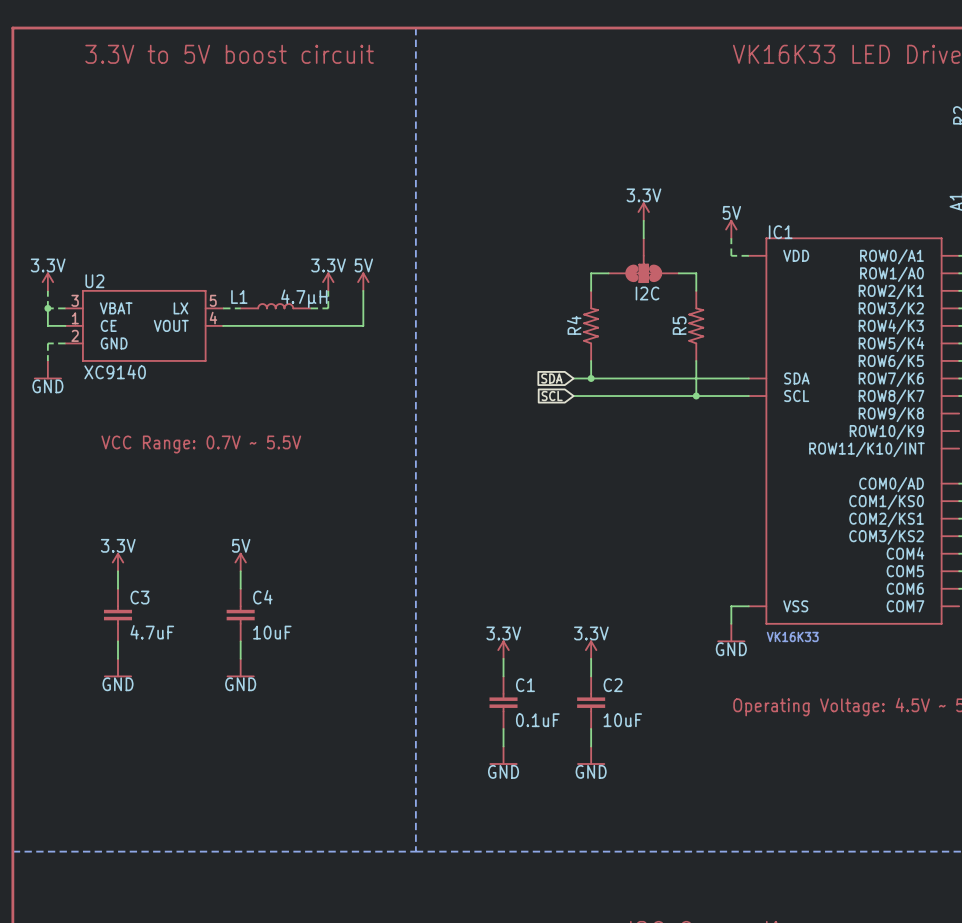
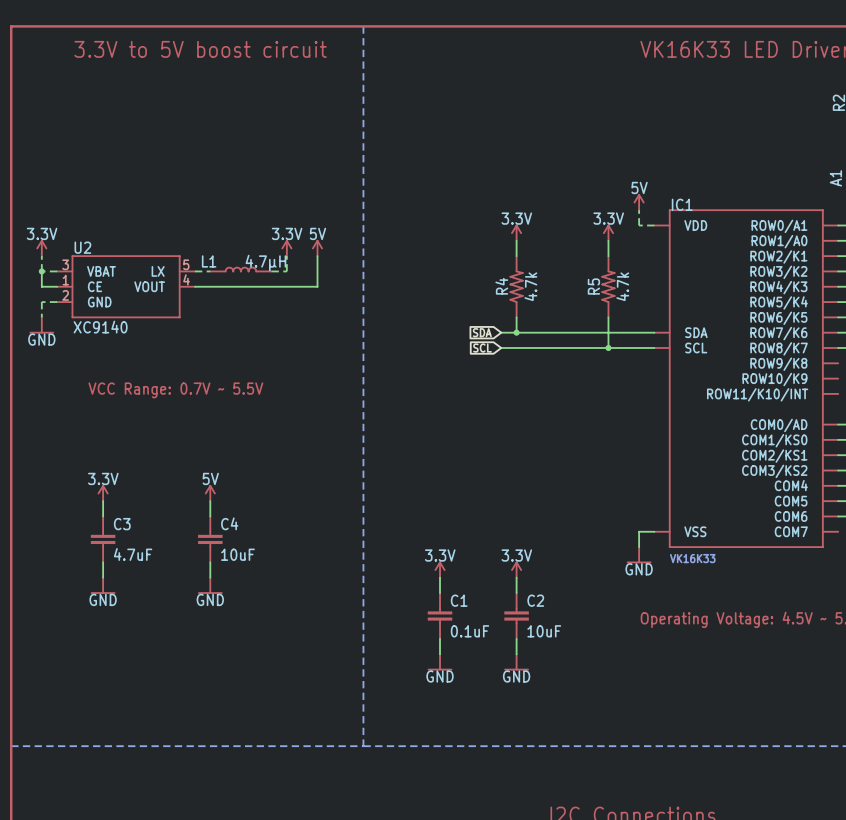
power symbol: 3.3V (643, 211) -> none
wire: (643, 220) (643, 238) -> none
I2C: (643, 260) -> none
power symbol: none -> 3.3V (516, 232)
power symbol: none -> 3.3V (608, 232)
wire: (591, 273) (608, 273) -> none
wire: (678, 273) (696, 273) -> none
R4 value: none -> 4.7k (530, 286)
R5 value: none -> 4.7k (622, 286)

